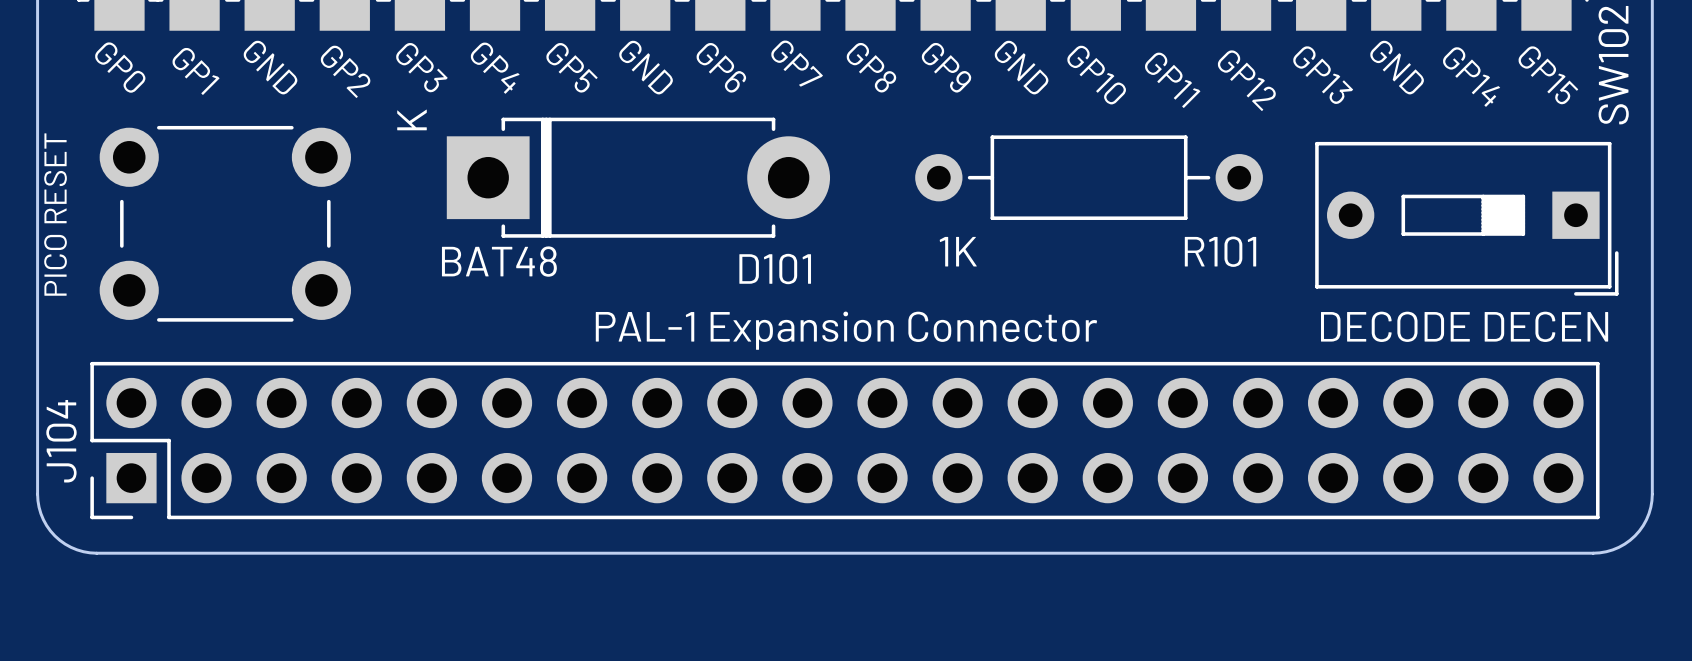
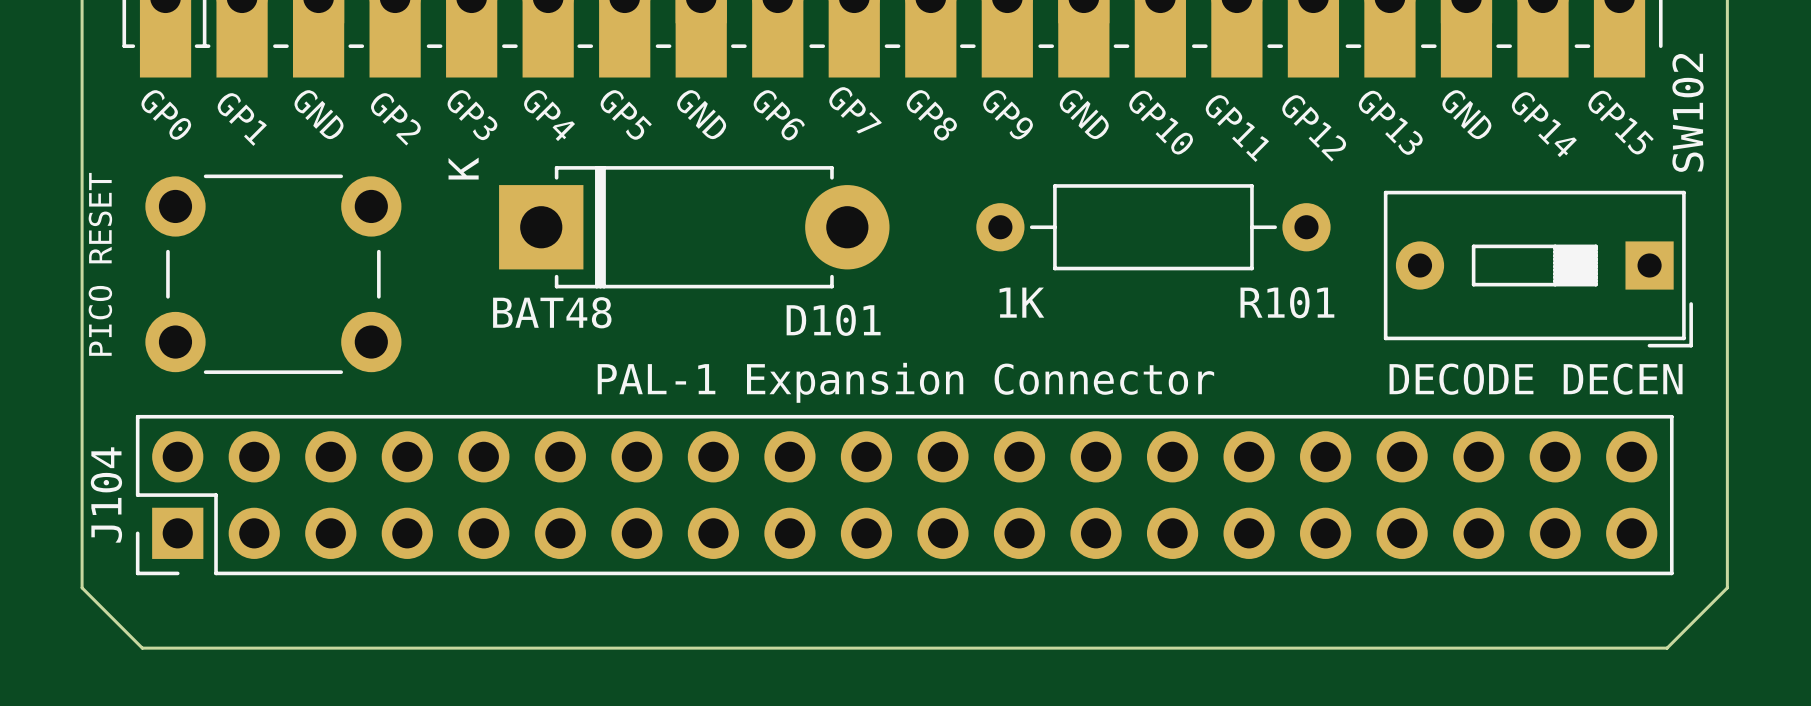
board edge: (37, 494) (43, 519) (54, 535) (77, 549) (96, 553) (1593, 553) (1612, 549) (1635, 535) (1649, 513) (1652, 494) -> (82, 549) (82, 587) (142, 648) (1667, 648) (1727, 587) (1727, 549)

